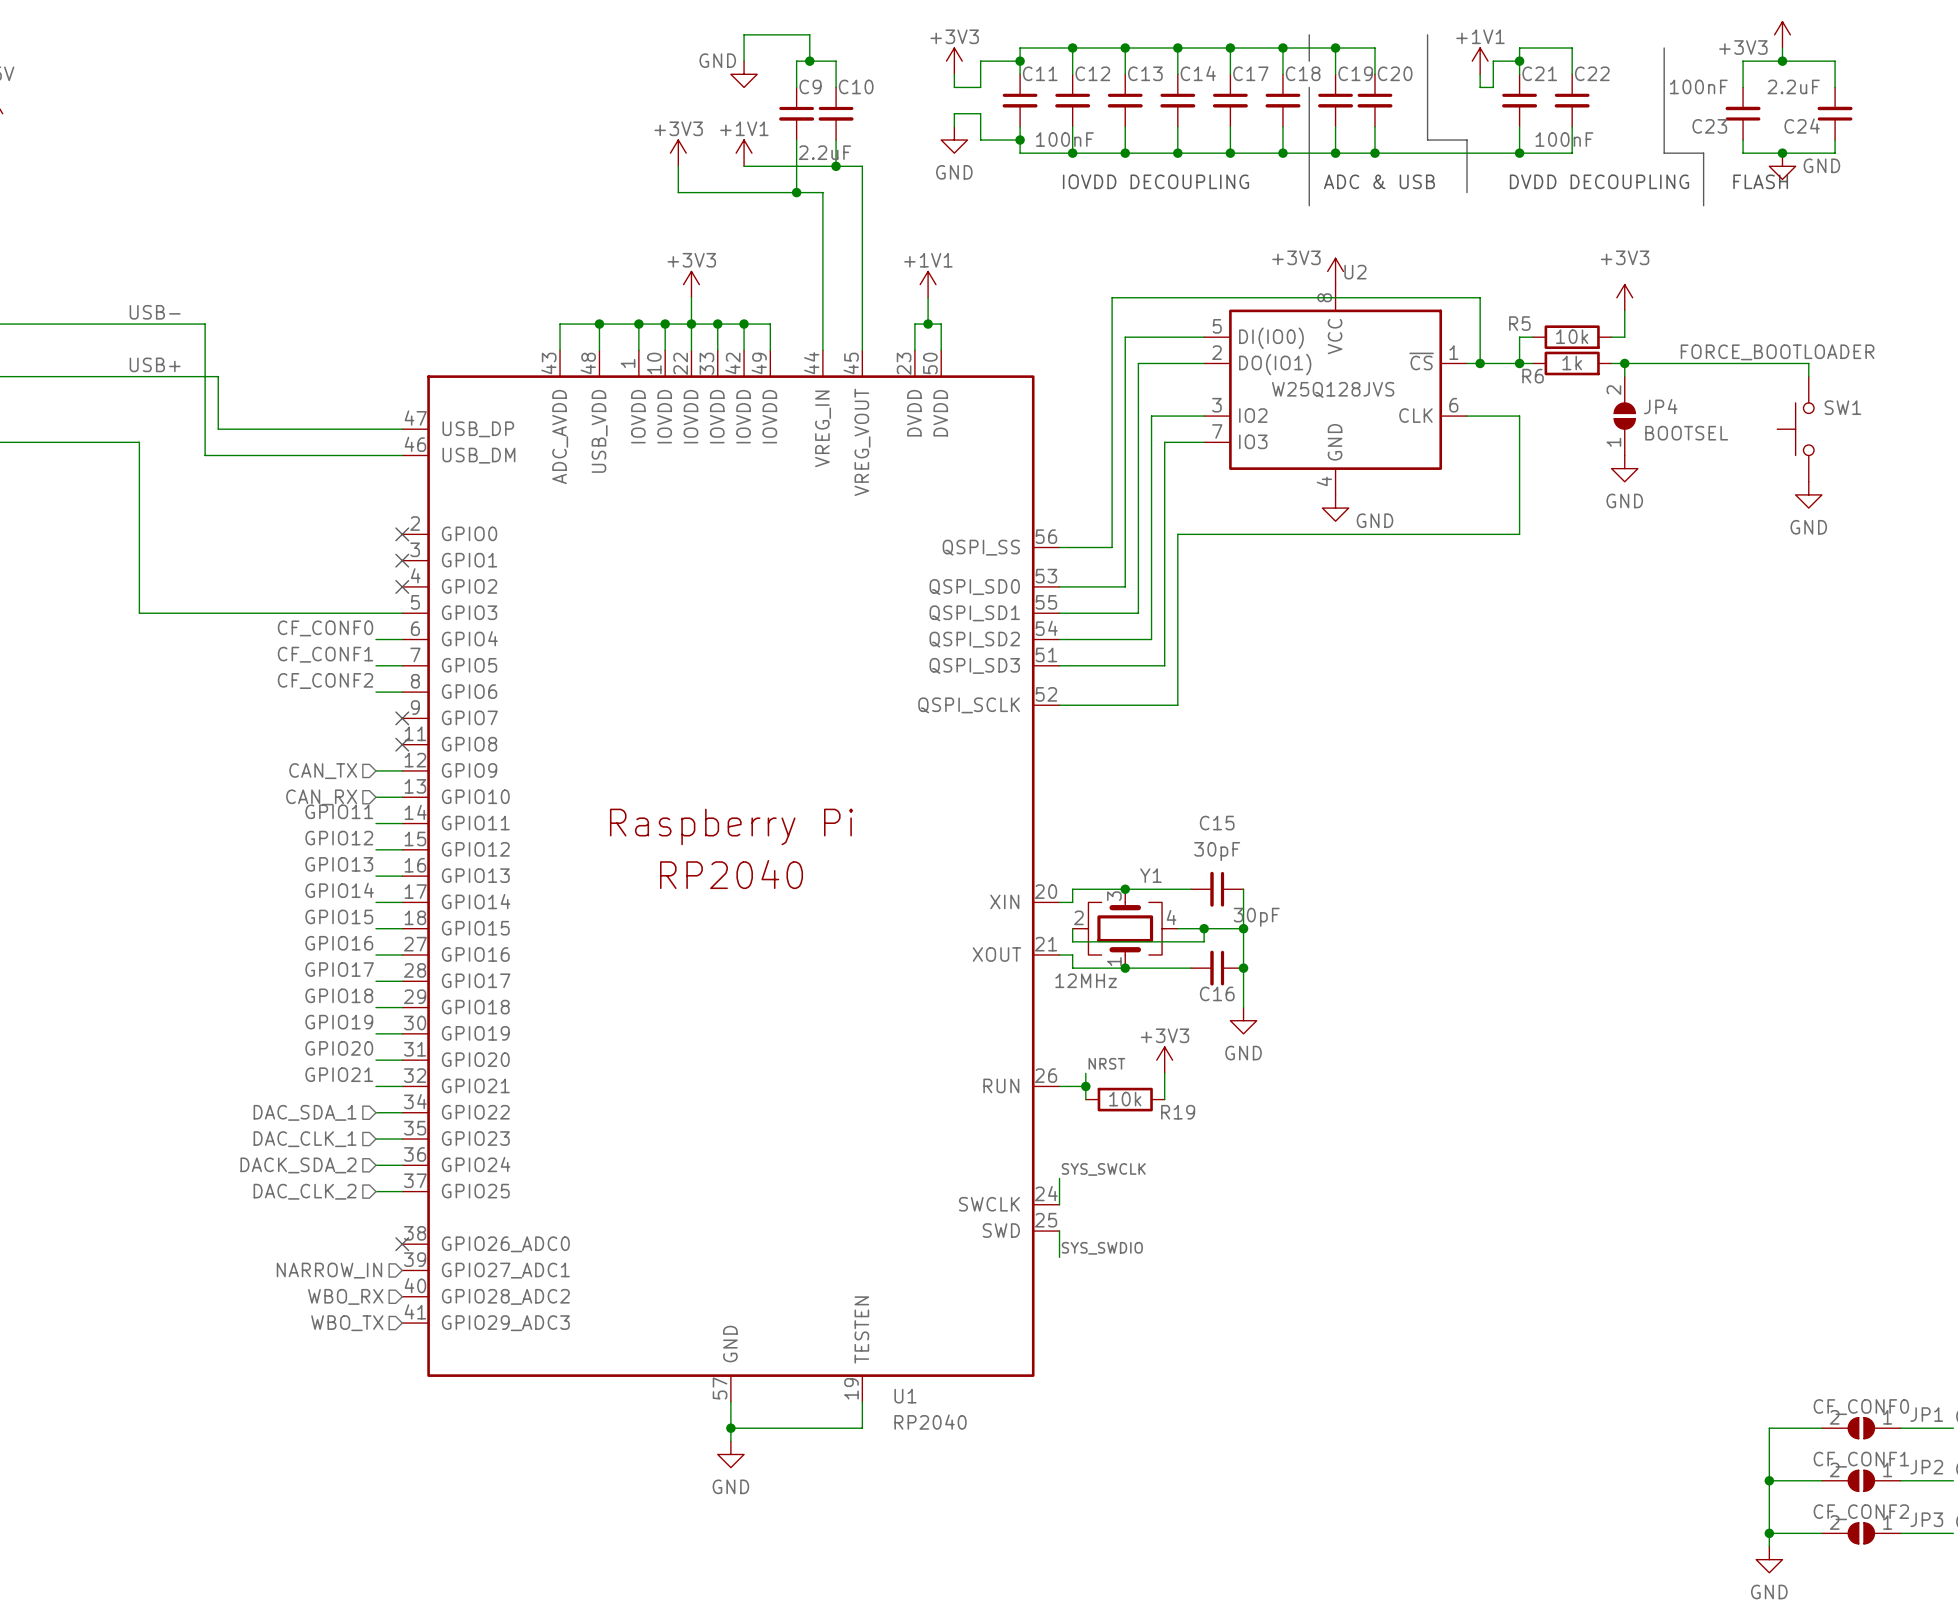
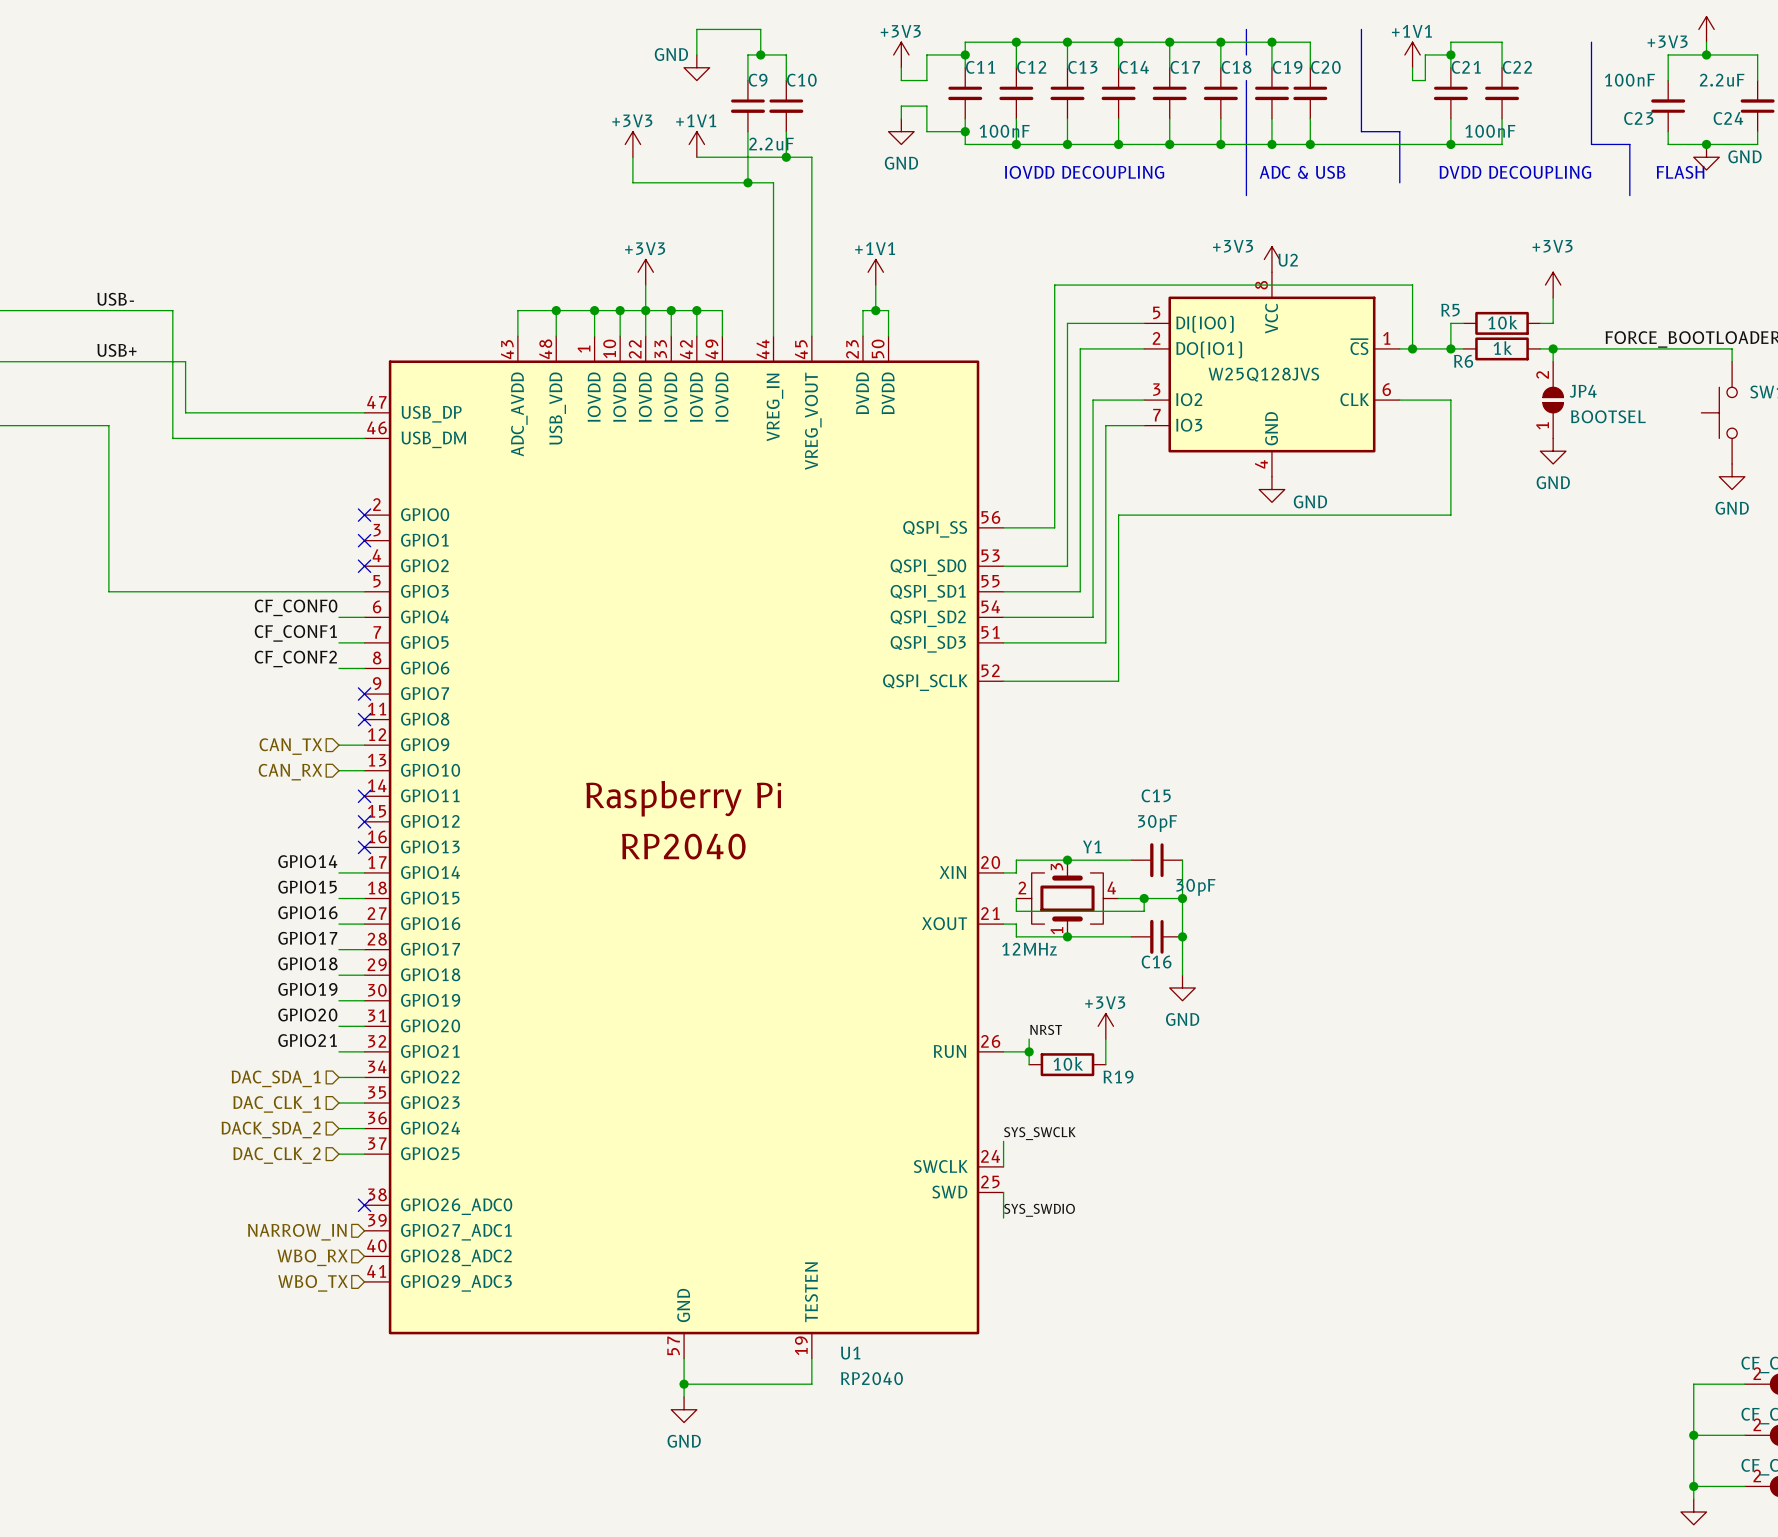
label: GPIO11 (339, 811) -> none
wire: (375, 823) (402, 823) -> none
no-connect mark: none -> (364, 796)
label: GPIO12 (339, 838) -> none
wire: (375, 849) (402, 849) -> none
no-connect mark: none -> (364, 821)
label: GPIO13 (339, 864) -> none
wire: (375, 876) (402, 876) -> none
no-connect mark: none -> (364, 847)

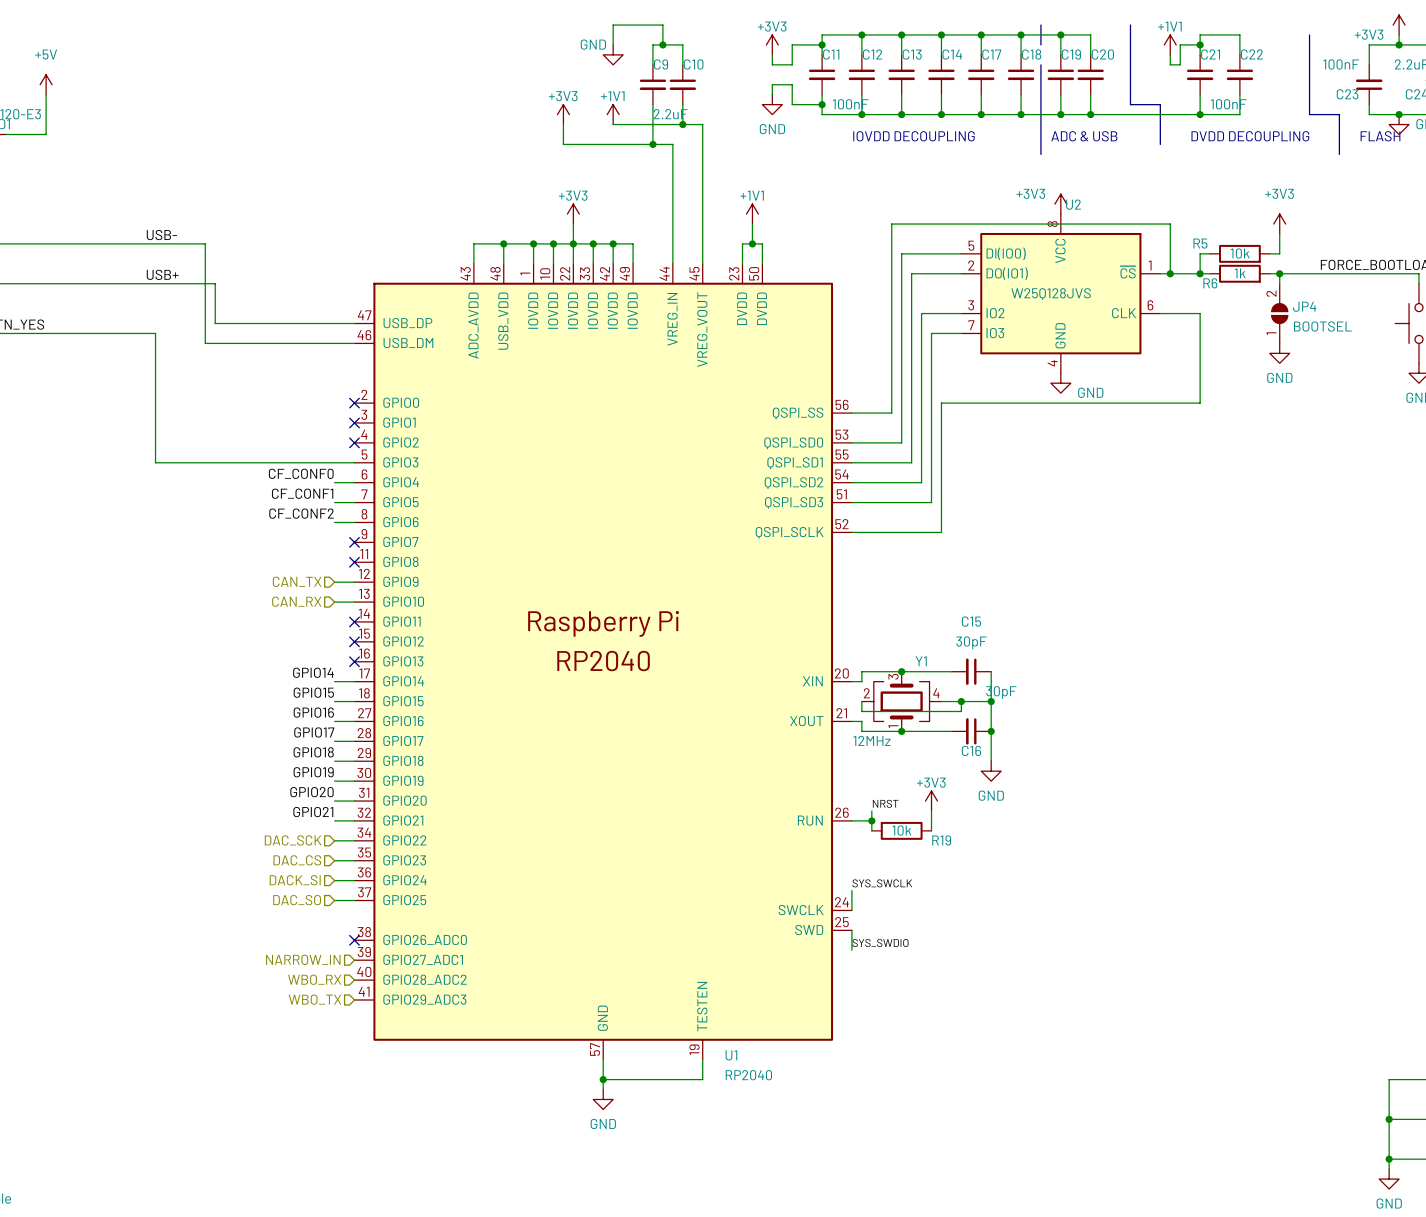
hierarchical label: DAC_SDA_1 (276, 1078) -> DAC_SCK (293, 840)
hierarchical label: DAC_CLK_1 (277, 1104) -> DAC_CS (297, 860)
hierarchical label: DACK_SDA_2 (271, 1130) -> DACK_SI (295, 880)
hierarchical label: DAC_CLK_2 (277, 1155) -> DAC_SO (297, 900)

